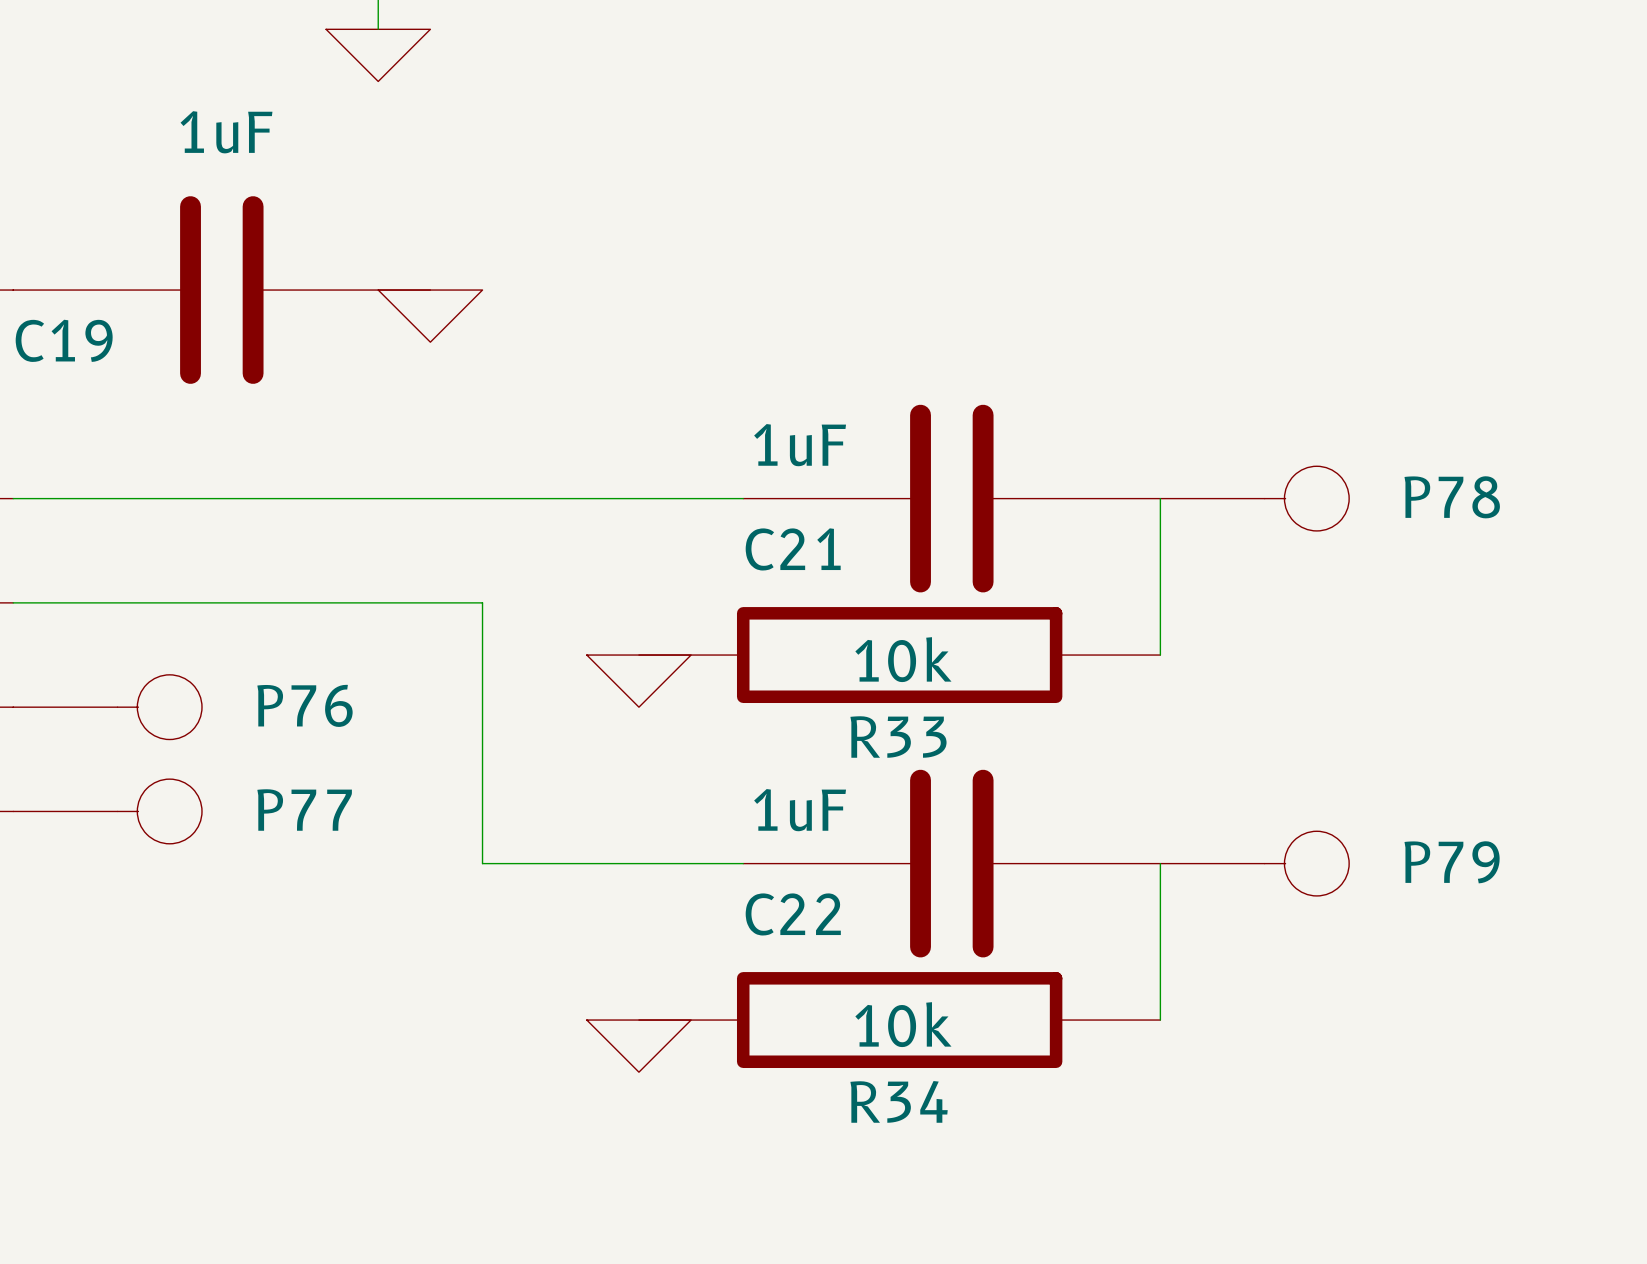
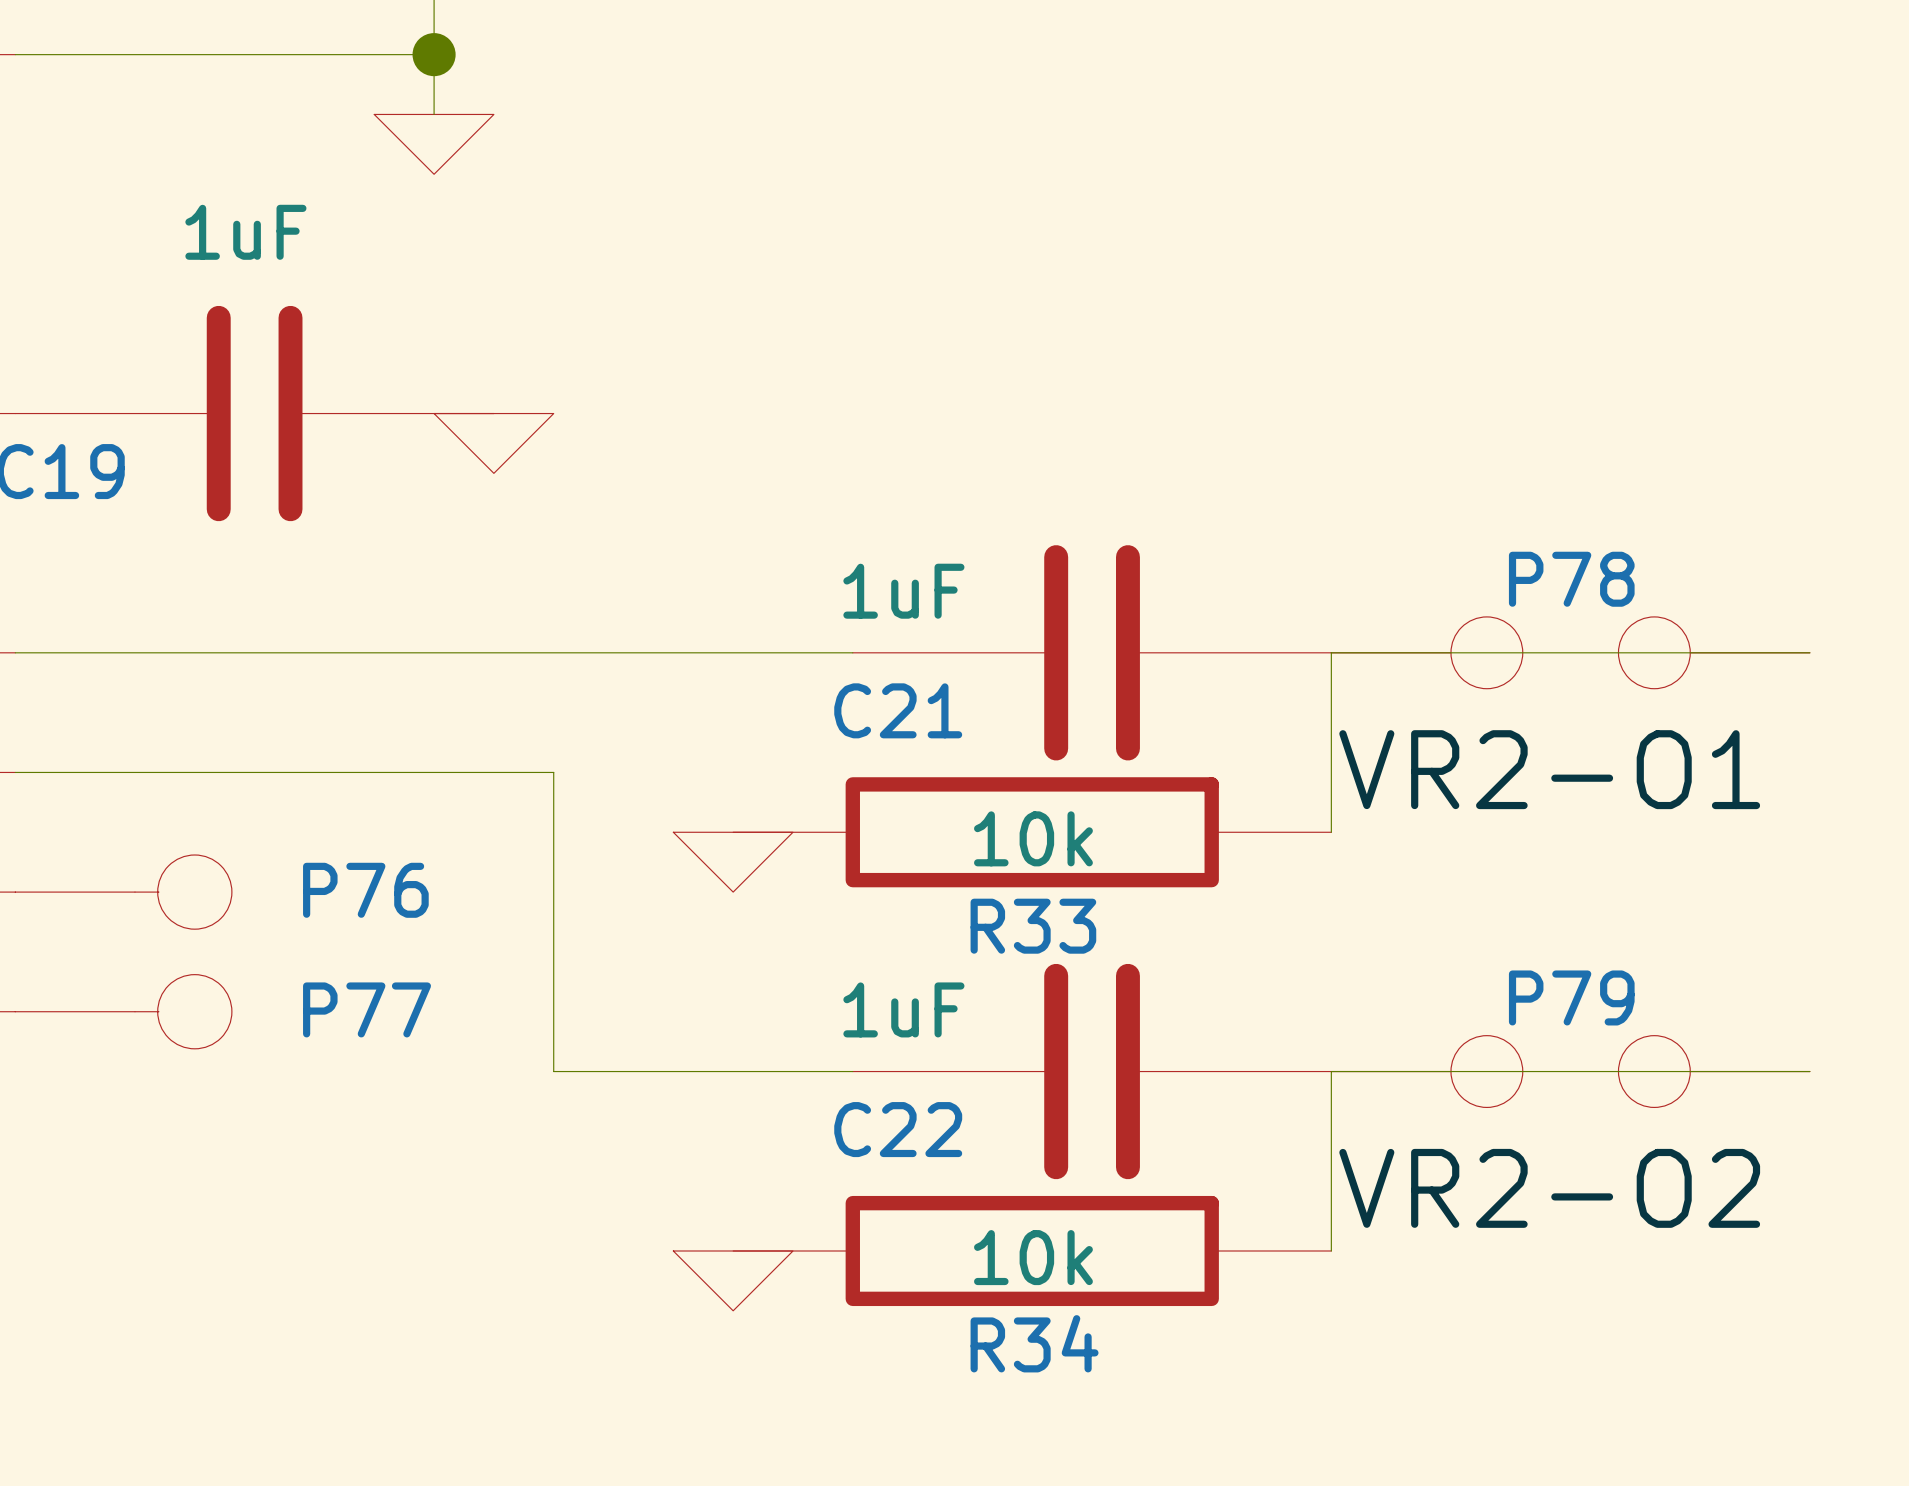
P78 symbol: [1160, 466, 1350, 531] -> [1331, 616, 1810, 689]
P78 name position: P78 (1452, 497) -> P78 (1571, 579)
wire: none -> (1331, 652) (1809, 652)
label: none -> VR2-O1 (1549, 769)
P79 symbol: [1160, 831, 1350, 896] -> [1331, 1035, 1810, 1108]
P79 name position: P79 (1452, 862) -> P79 (1571, 997)
wire: none -> (1331, 1071) (1809, 1071)
label: none -> VR2-O2 (1549, 1188)

